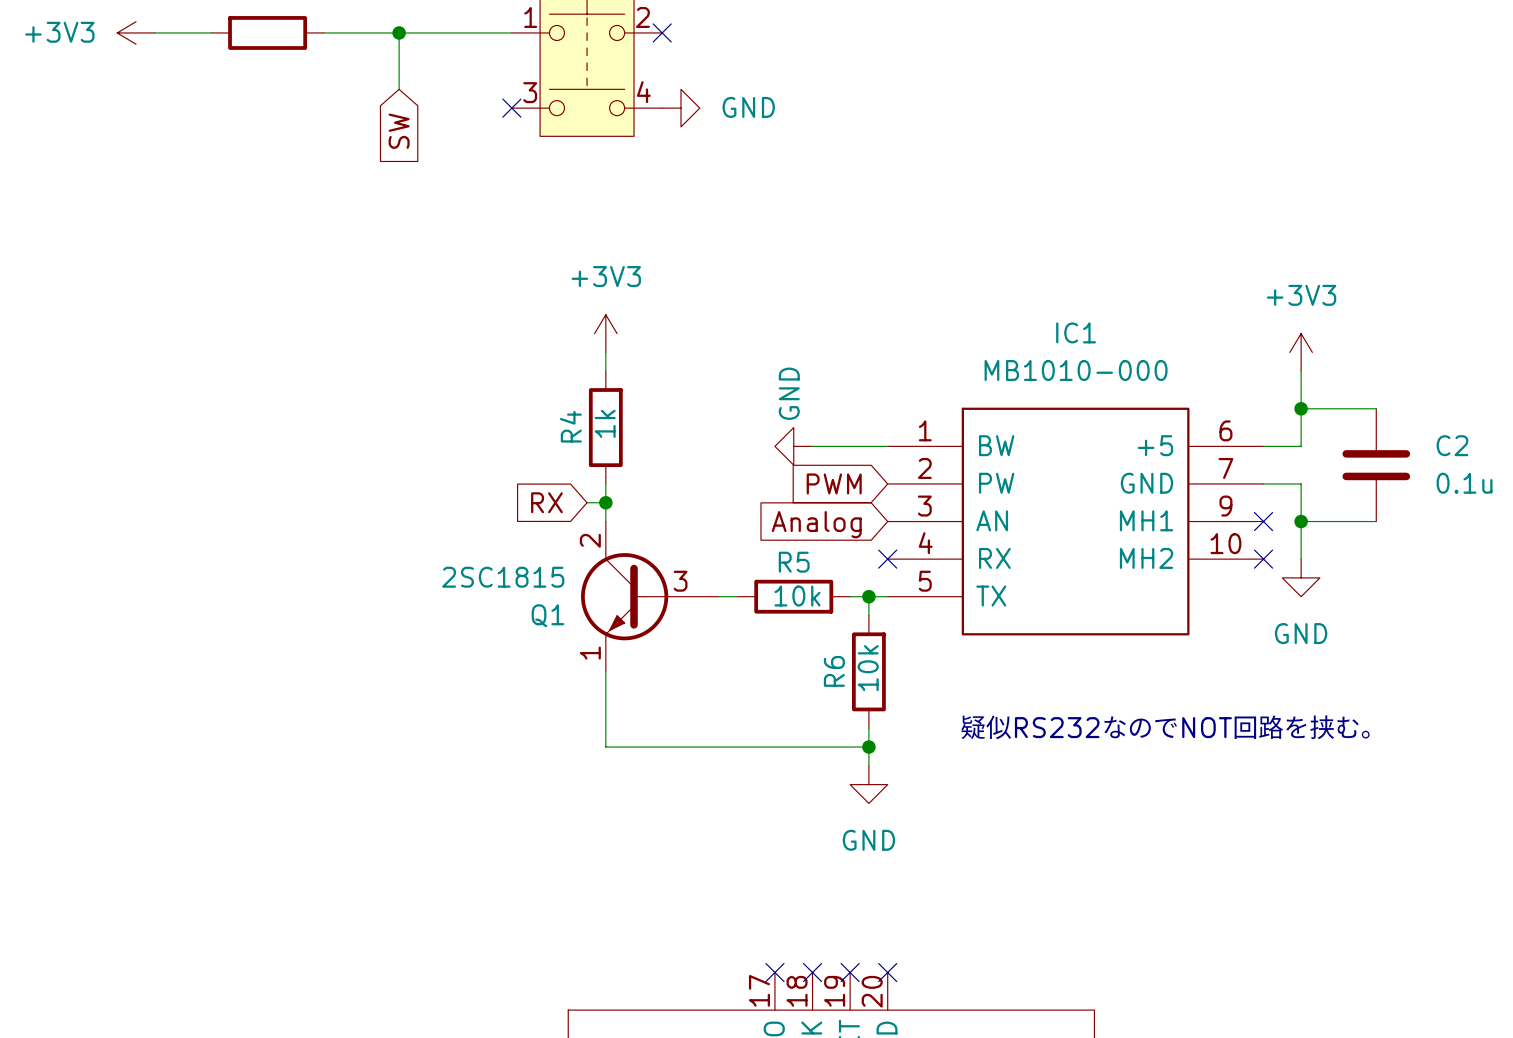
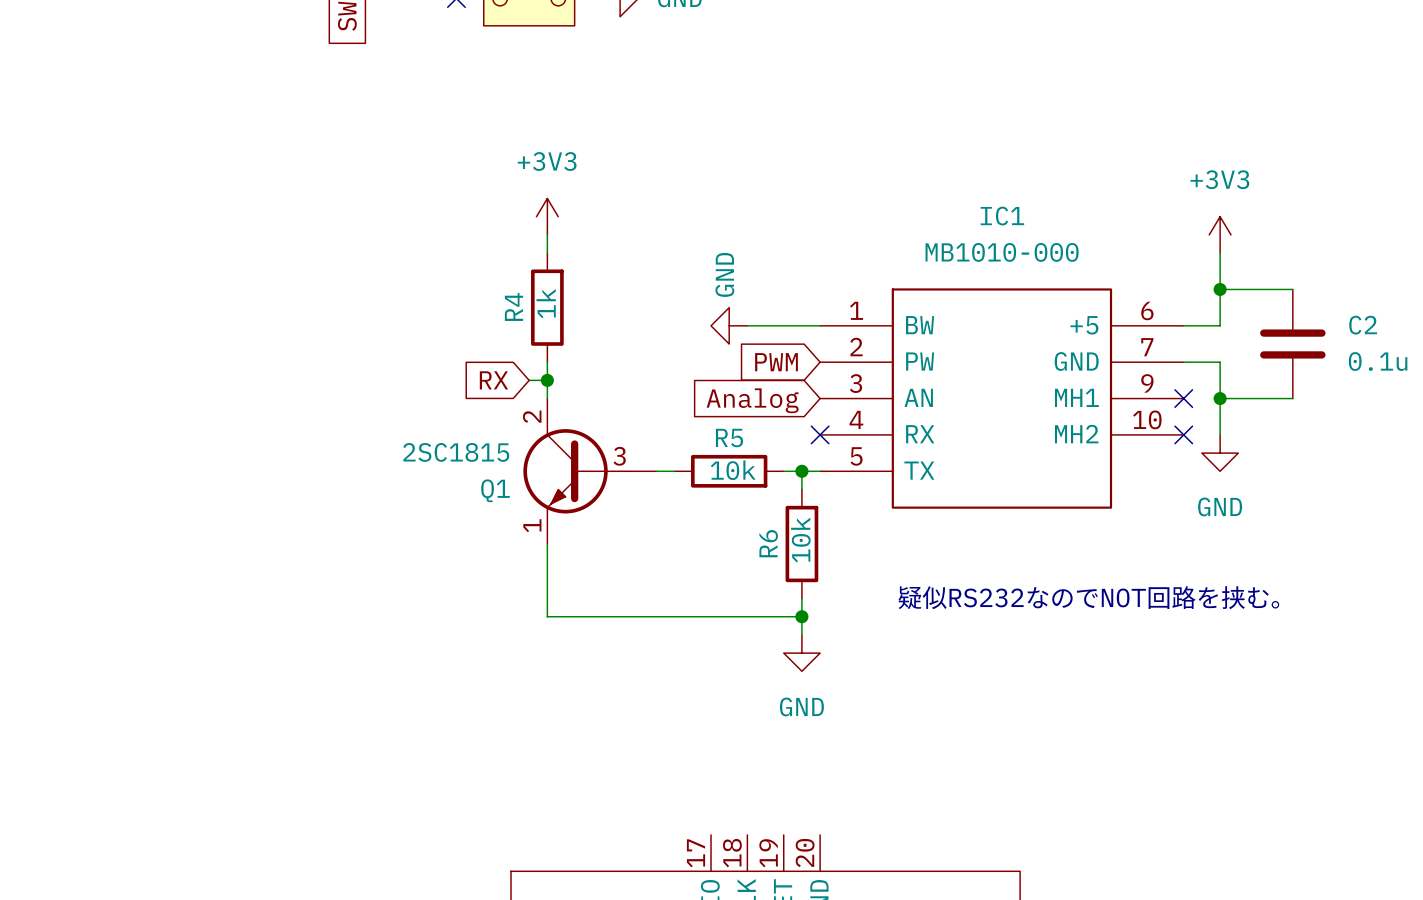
no-connect mark: (774, 972) -> none
no-connect mark: (812, 972) -> none
no-connect mark: (850, 972) -> none
no-connect mark: (887, 972) -> none

